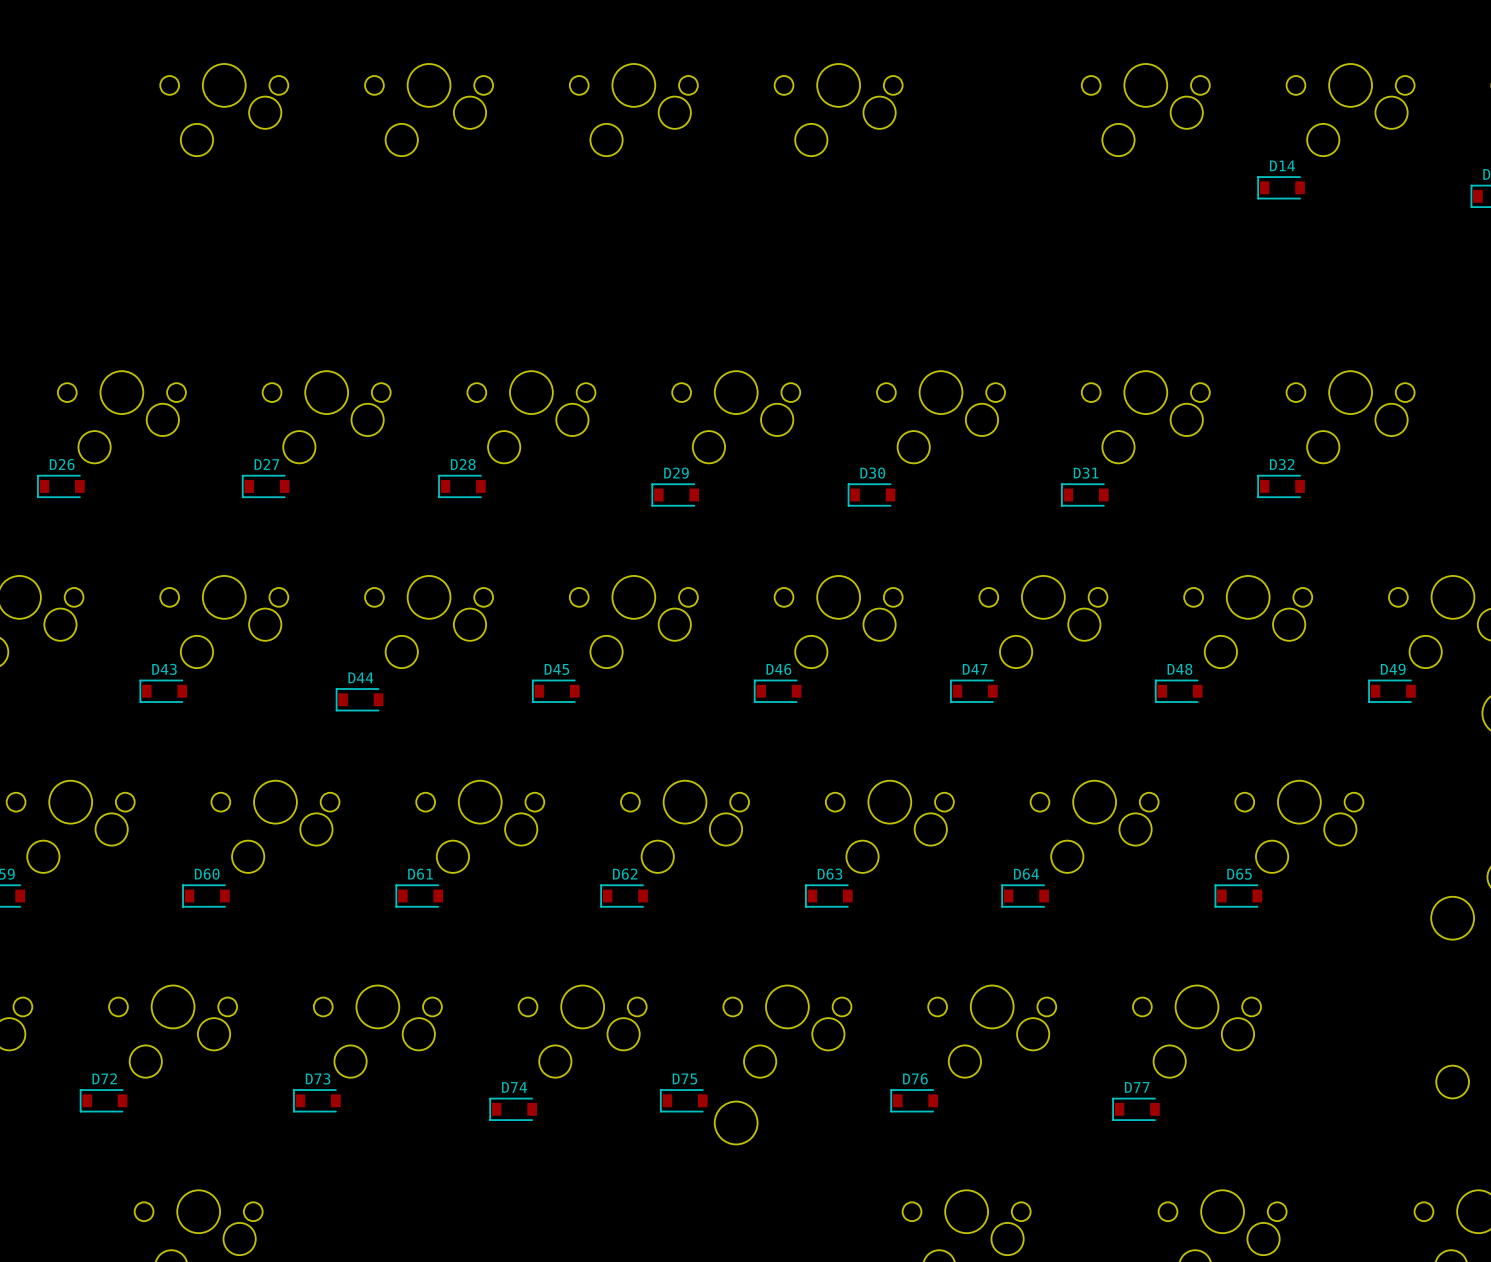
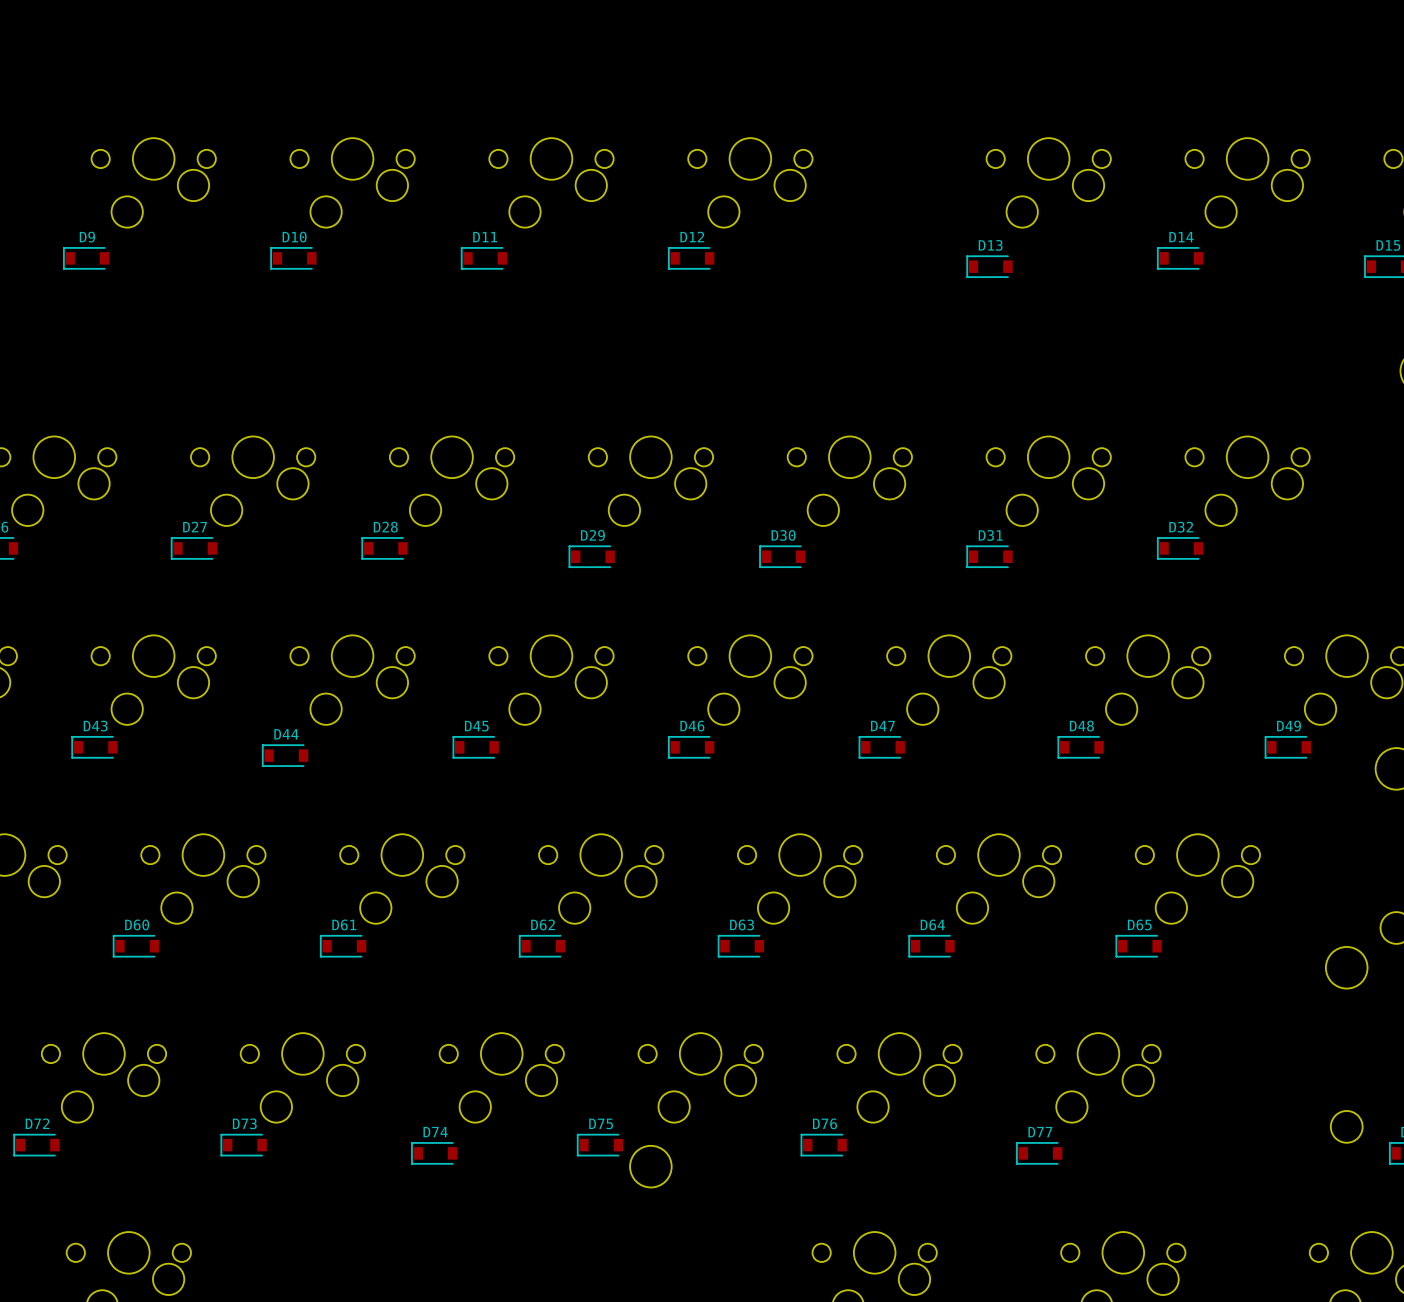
D9: none -> (86, 258)
D10: none -> (293, 258)
D11: none -> (484, 258)
D12: none -> (691, 258)
D13: none -> (989, 266)

